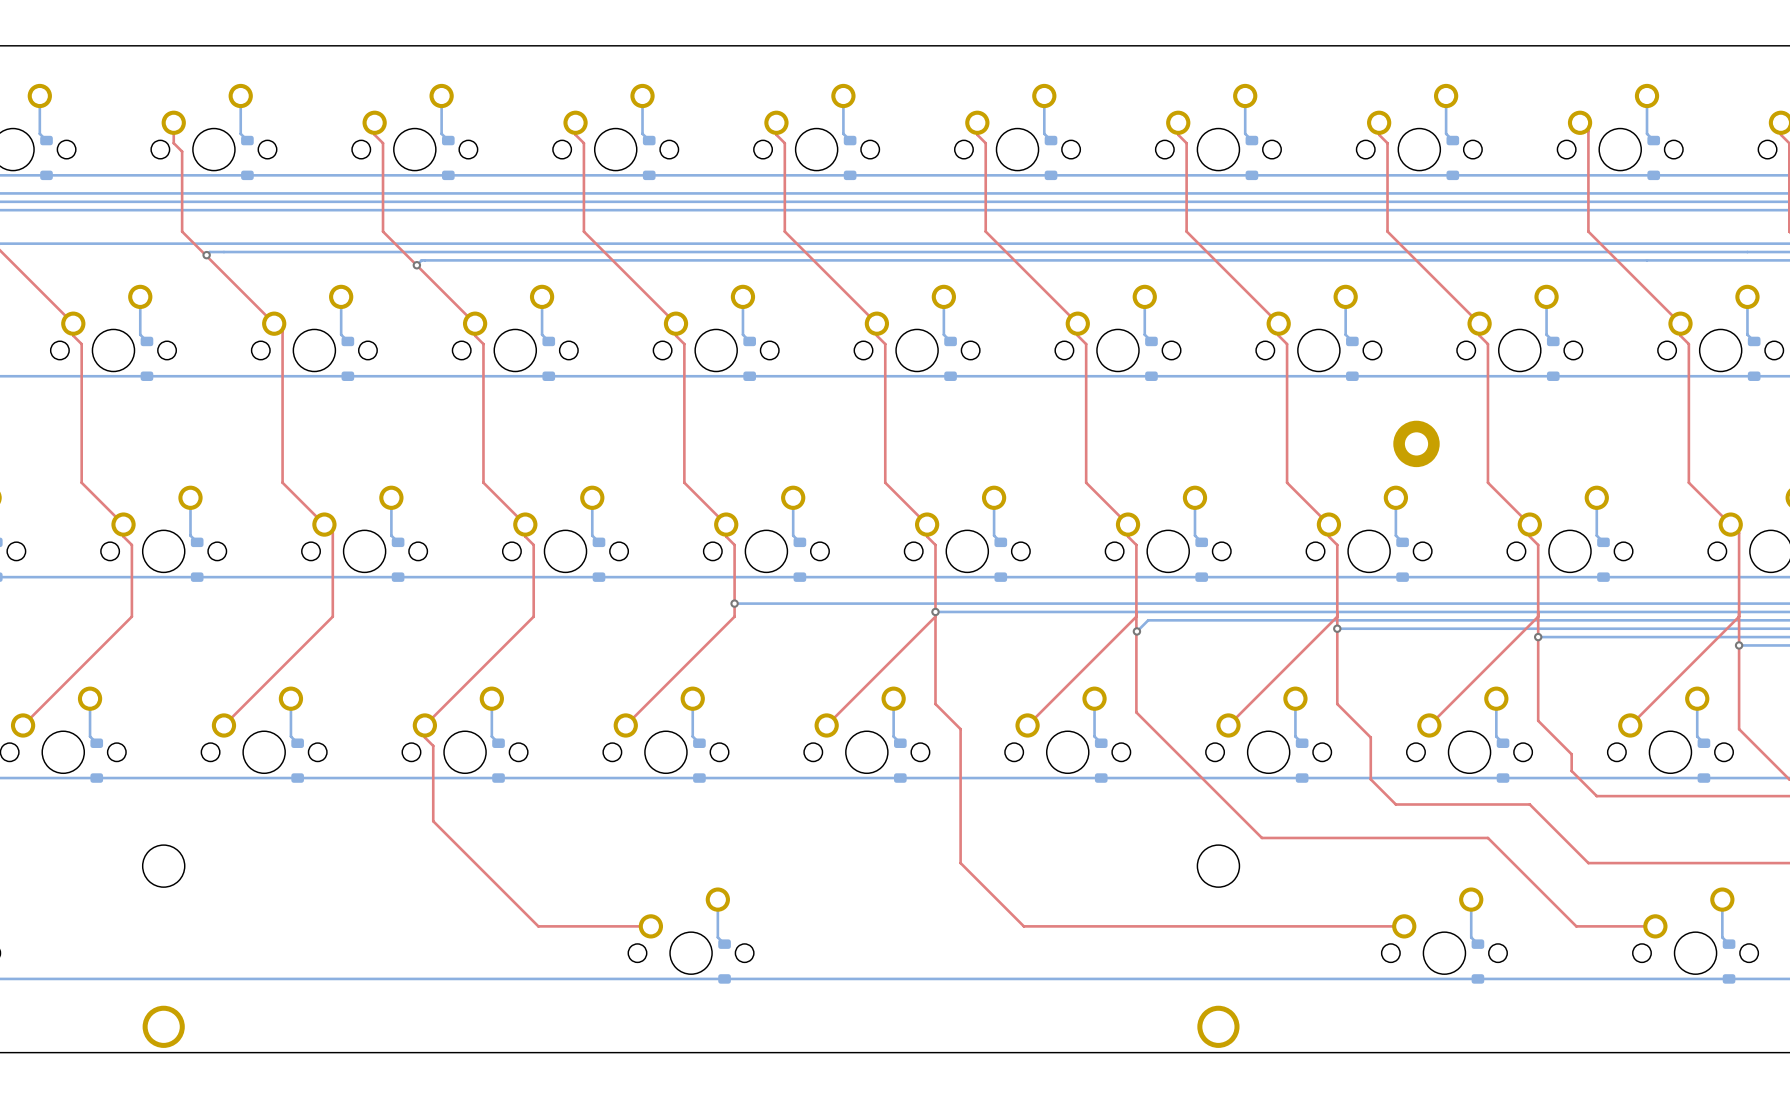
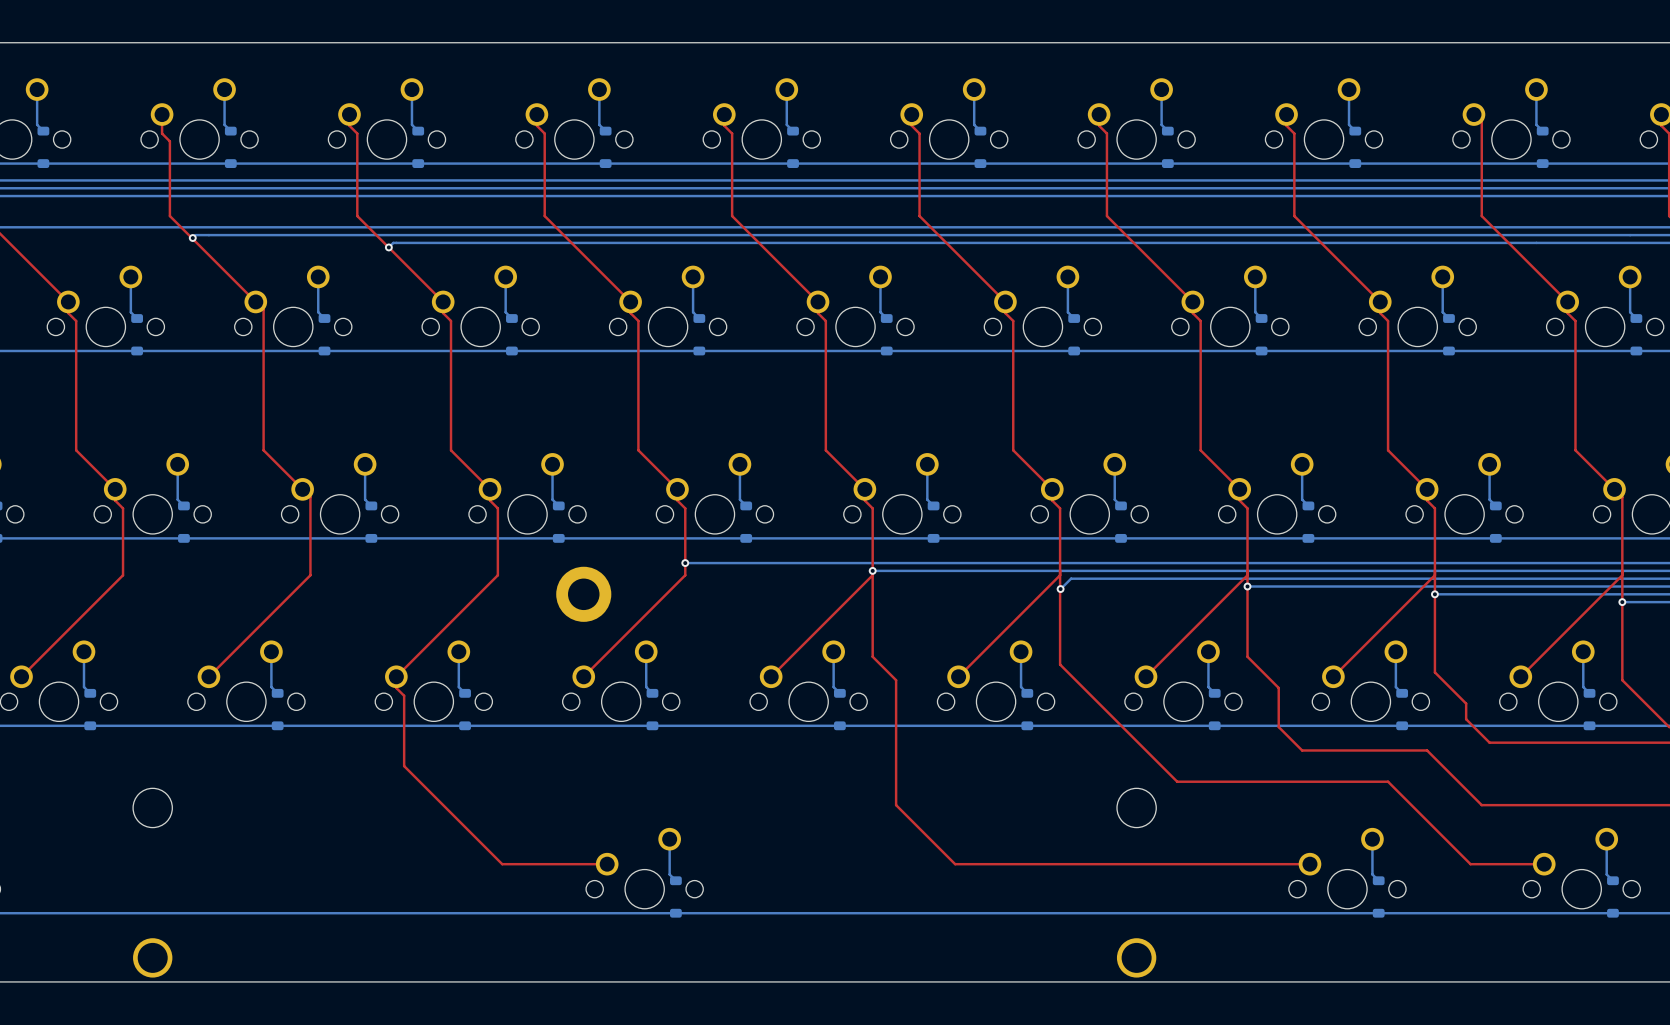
part: (1416, 443) -> none
part: none -> (583, 594)

